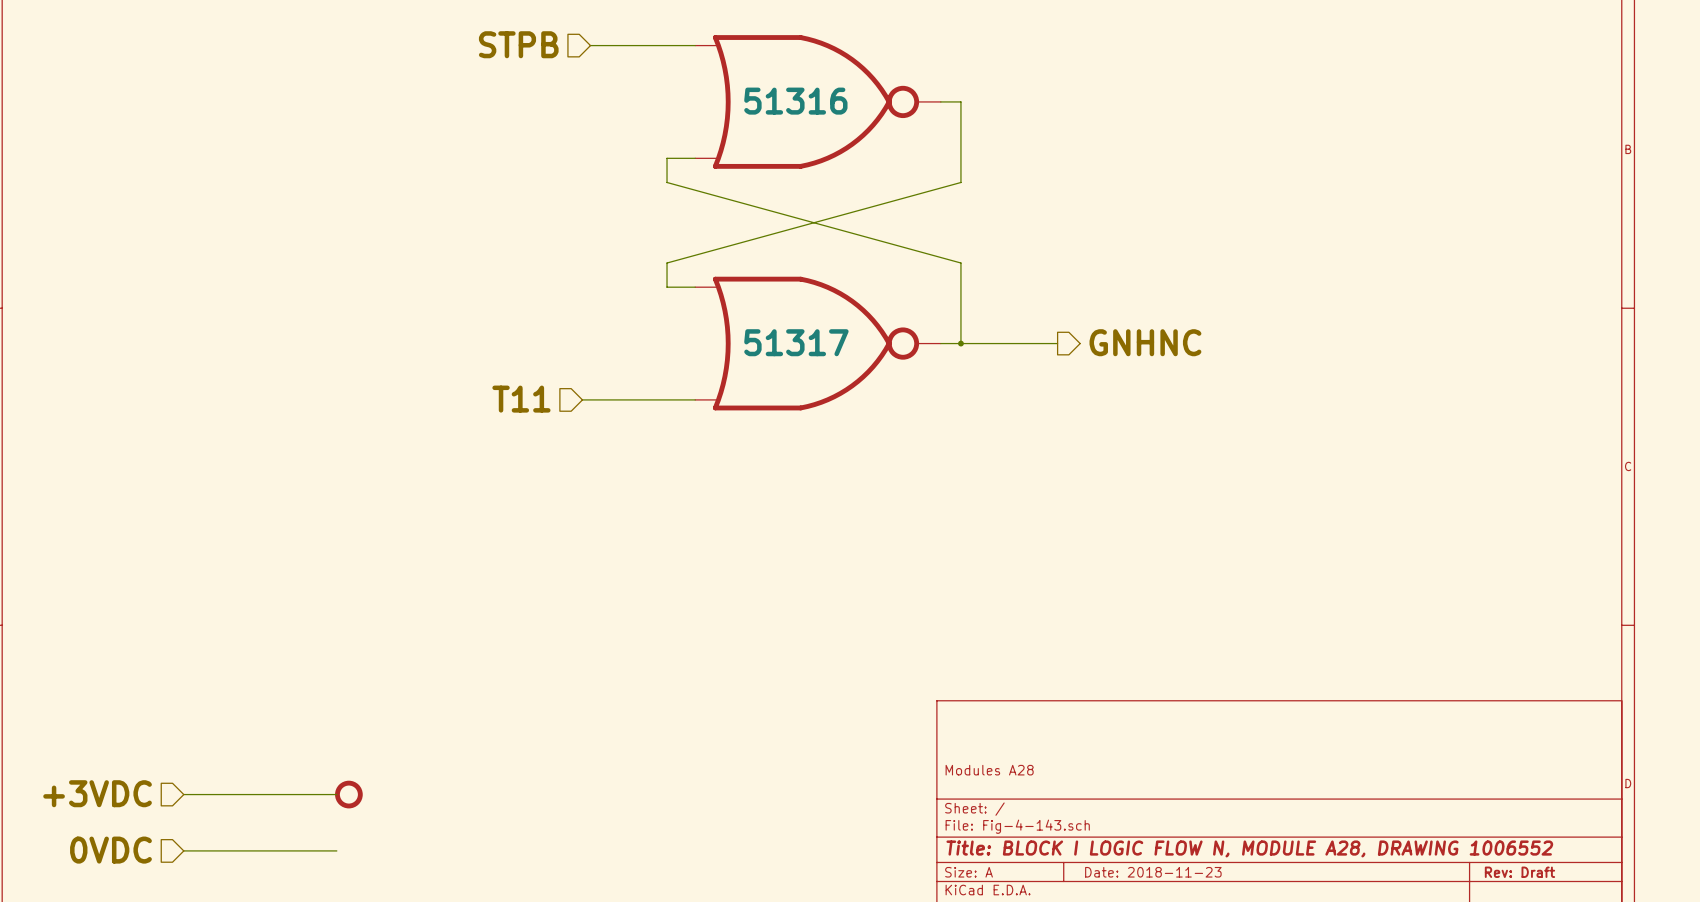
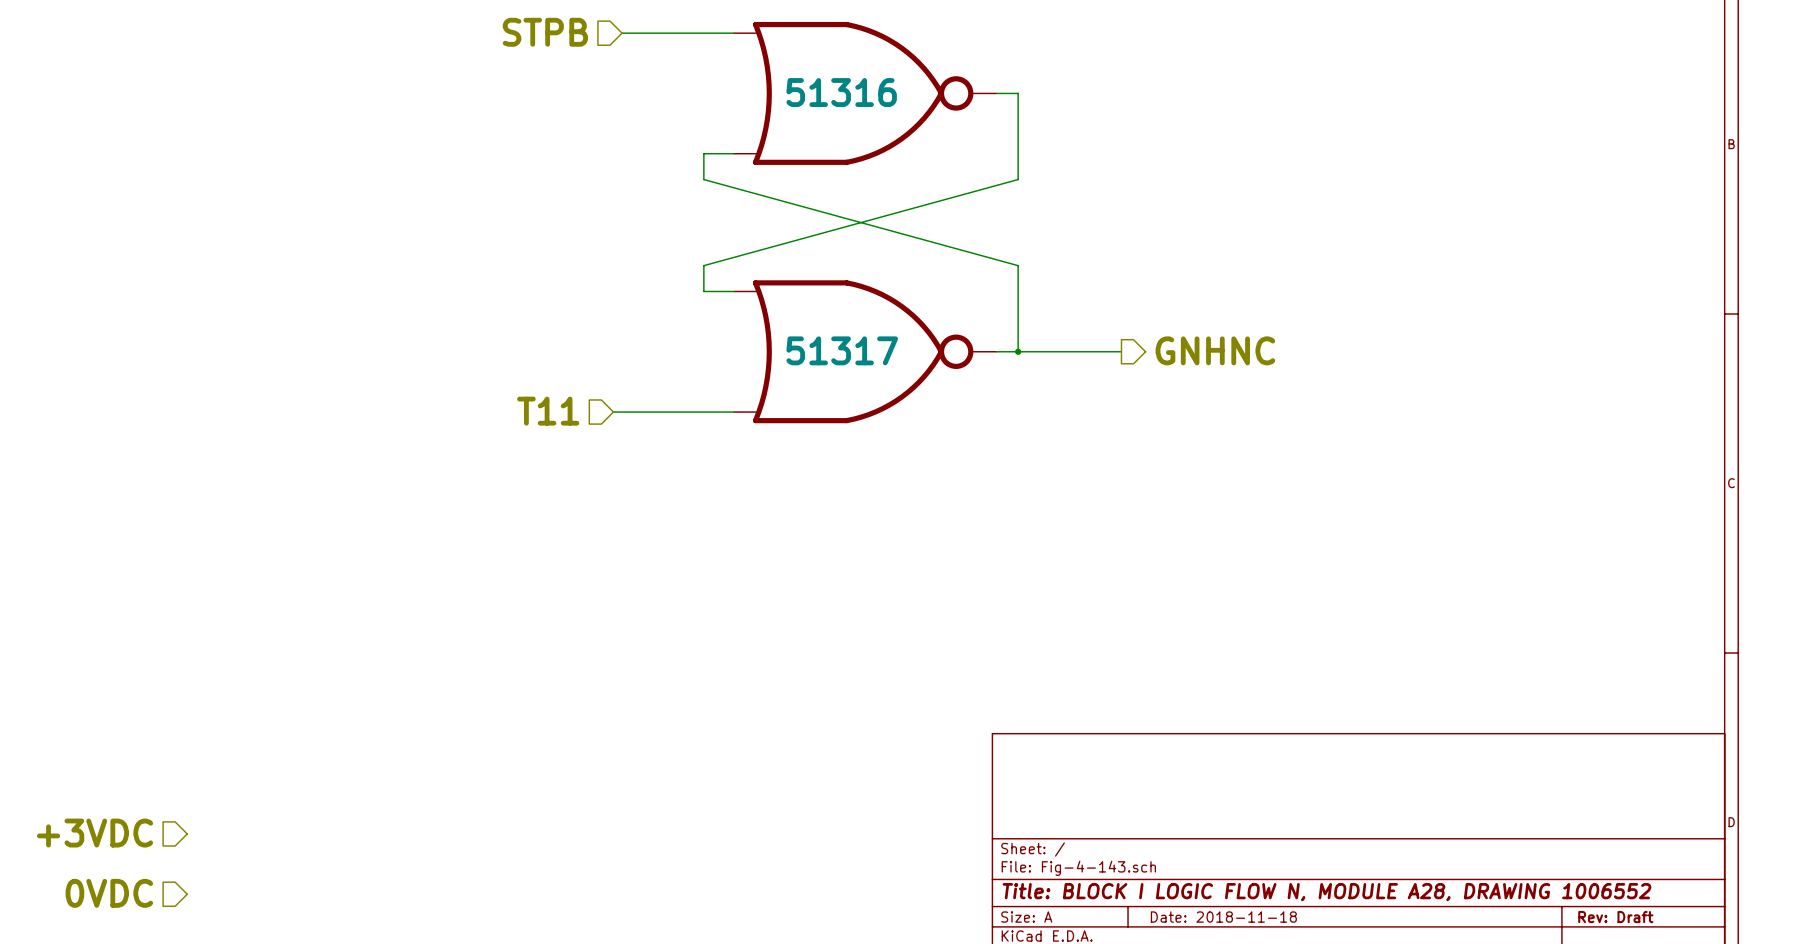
title block: Modules A28 (989, 770) -> none
wire: (183, 794) (336, 794) -> none
part: (348, 794) -> none
wire: (183, 850) (336, 850) -> none
title block: Date: 2018-11-23 (1153, 872) -> Date: 2018-11-18 (1223, 917)

